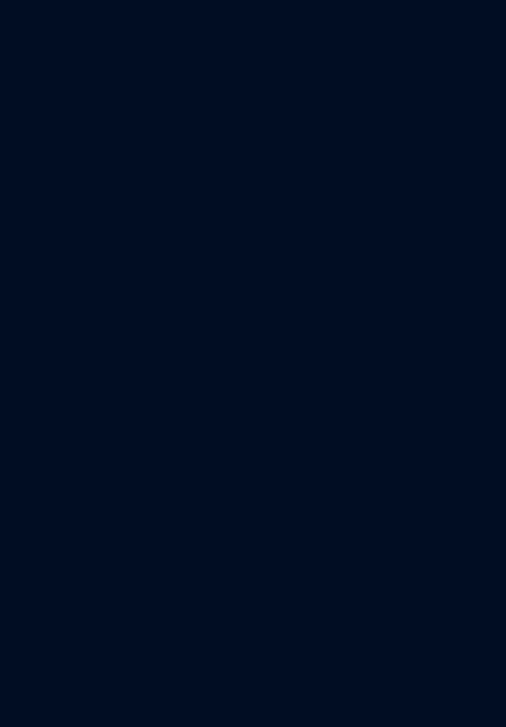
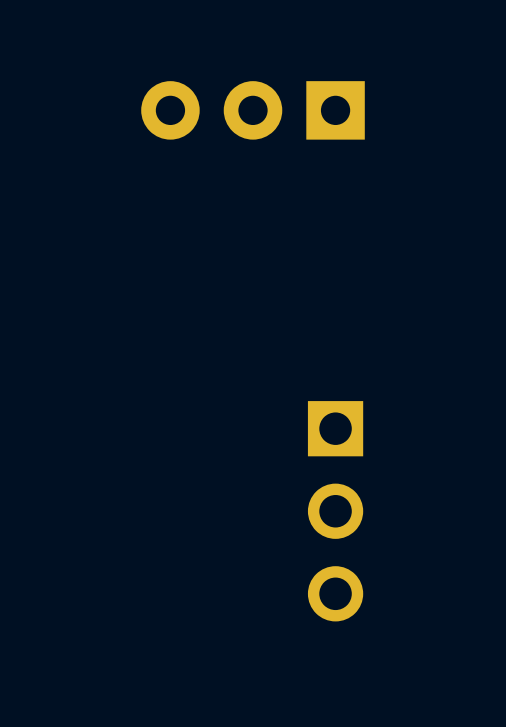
part: none -> (253, 110)
part: none -> (335, 511)

